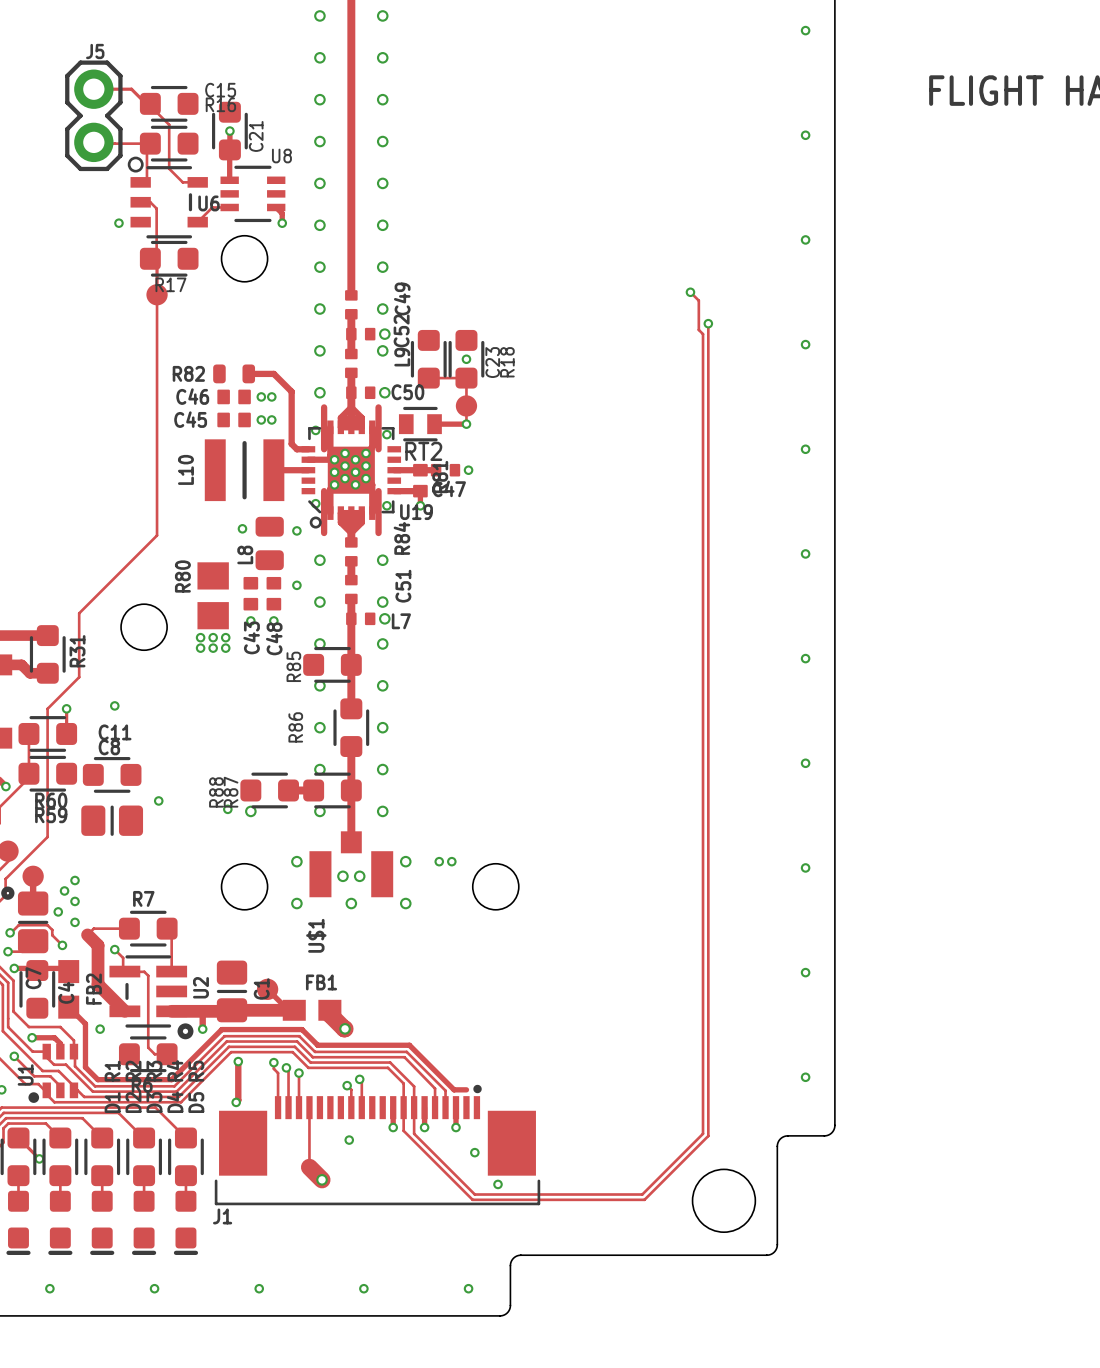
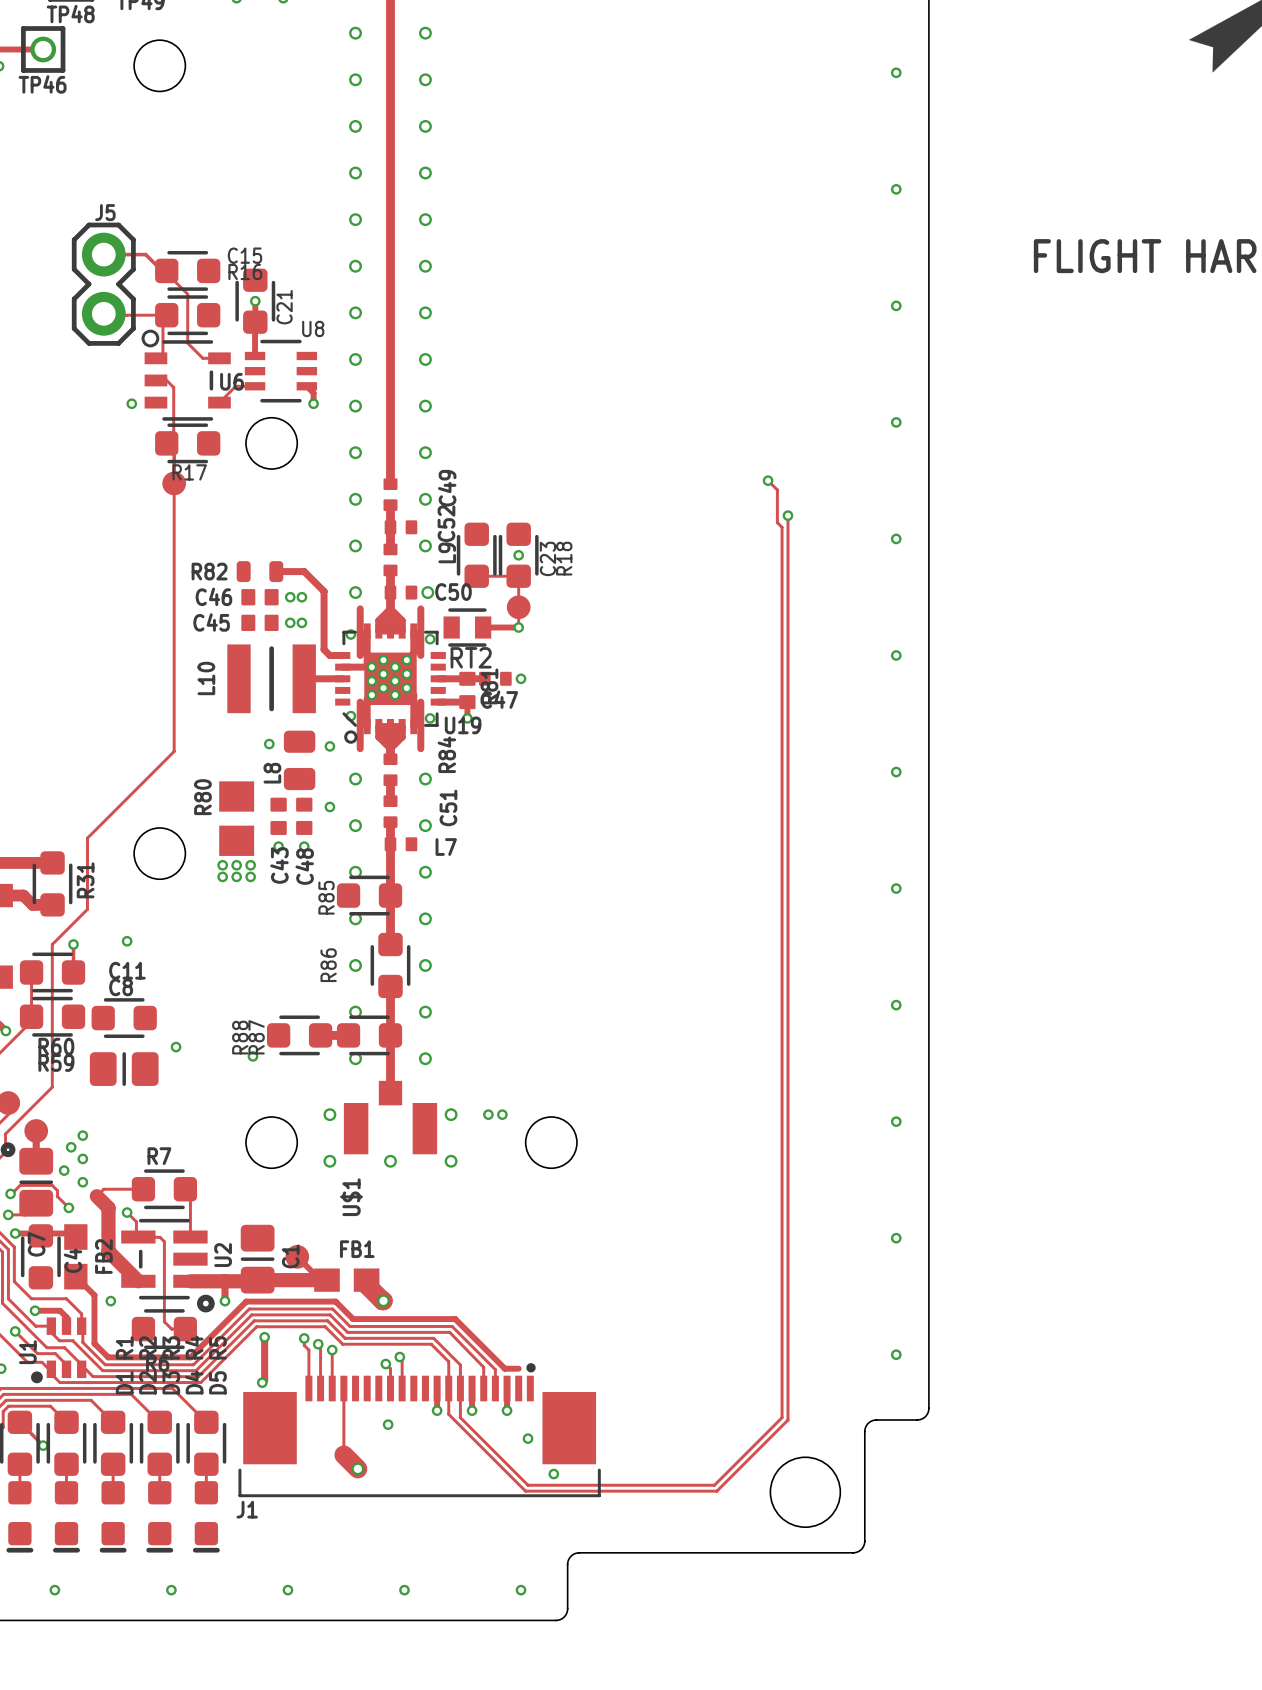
via: (384, 334) -> none
via: (384, 618) -> none
via: (250, 811) -> none
via: (342, 876) -> none
via: (359, 876) -> none

